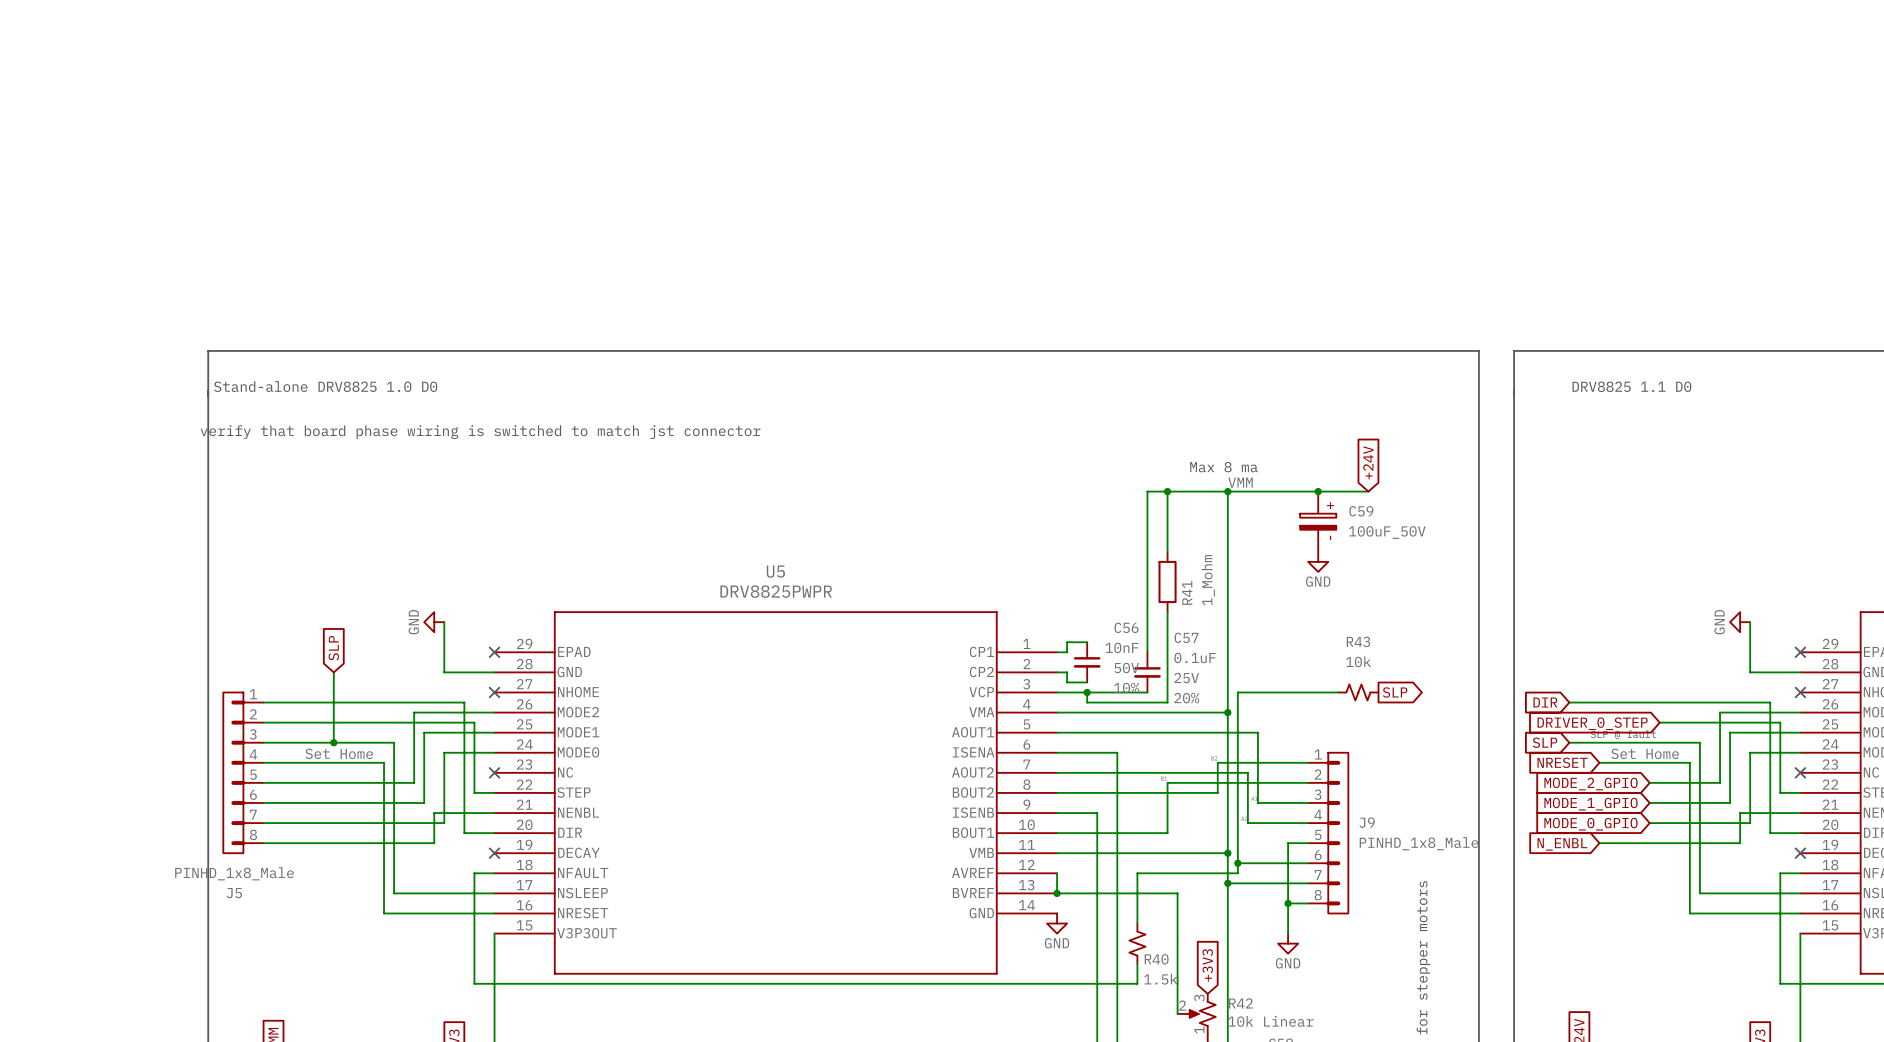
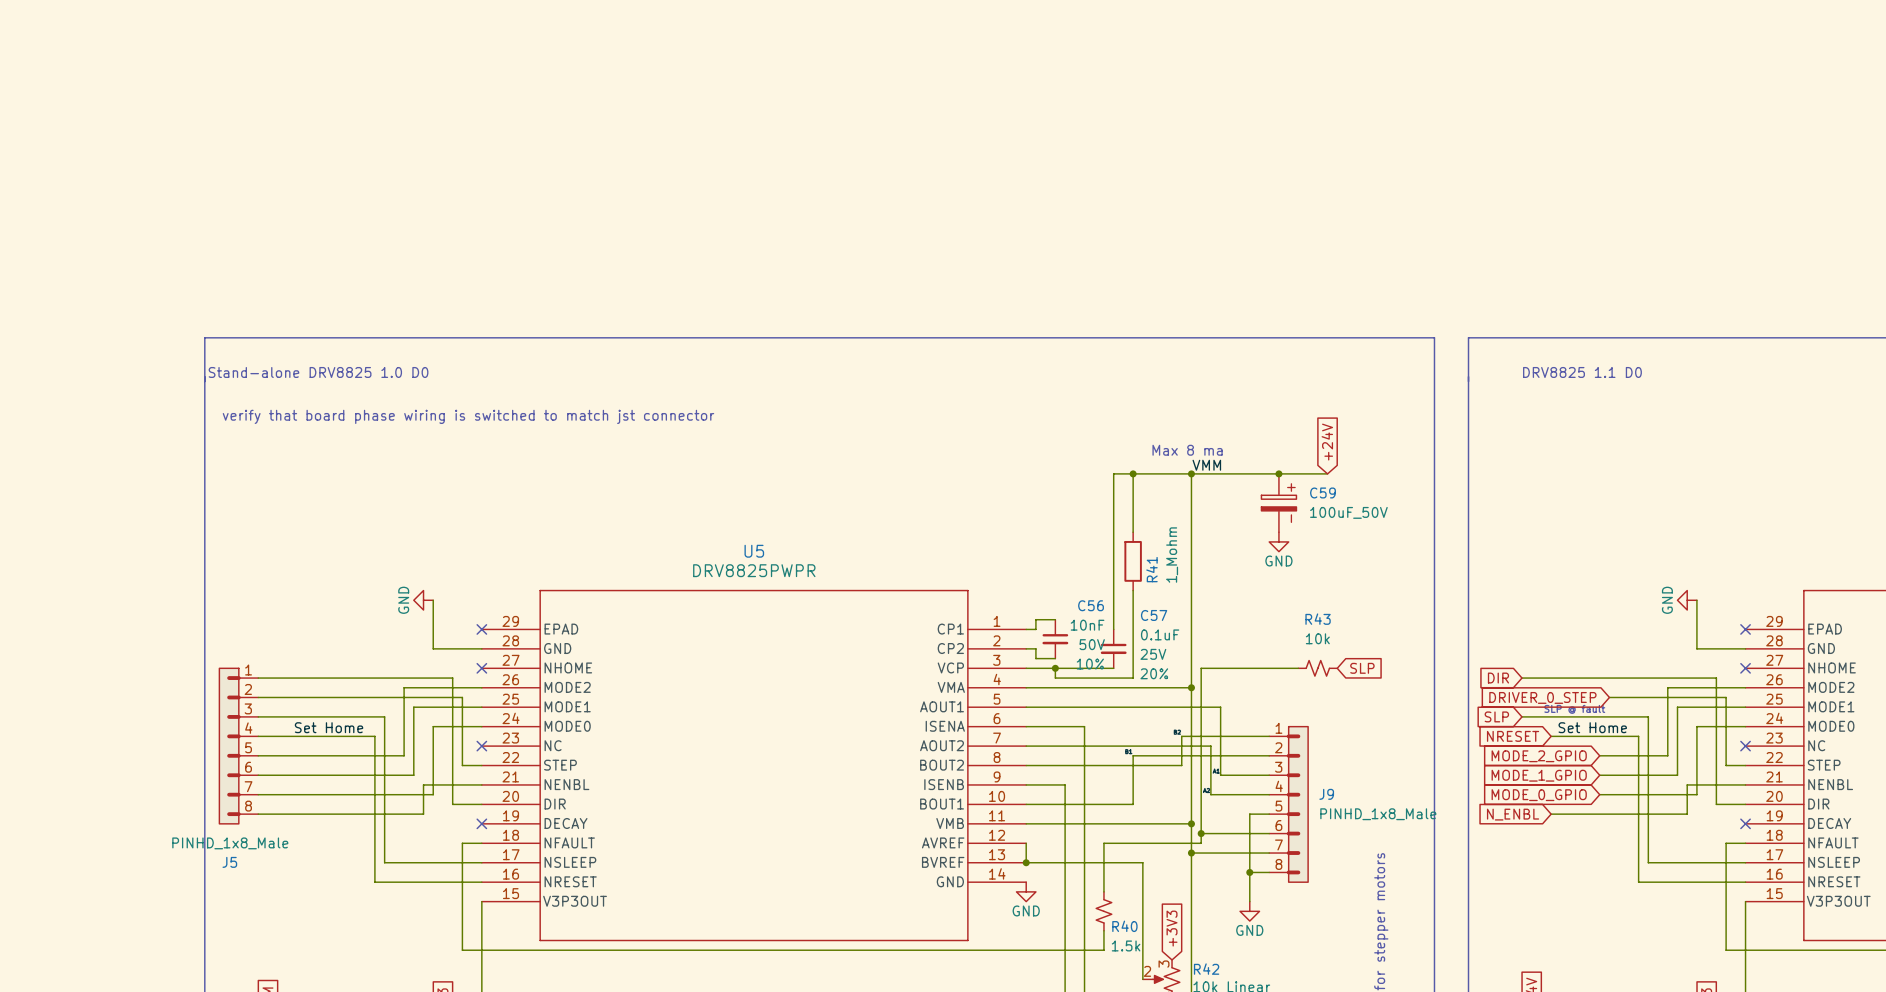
global label: SLP (333, 648) -> none
wire: (333, 672) (333, 742) -> none
global label shape: output (1395, 692) -> input (1362, 668)
junction: (333, 742) -> none

